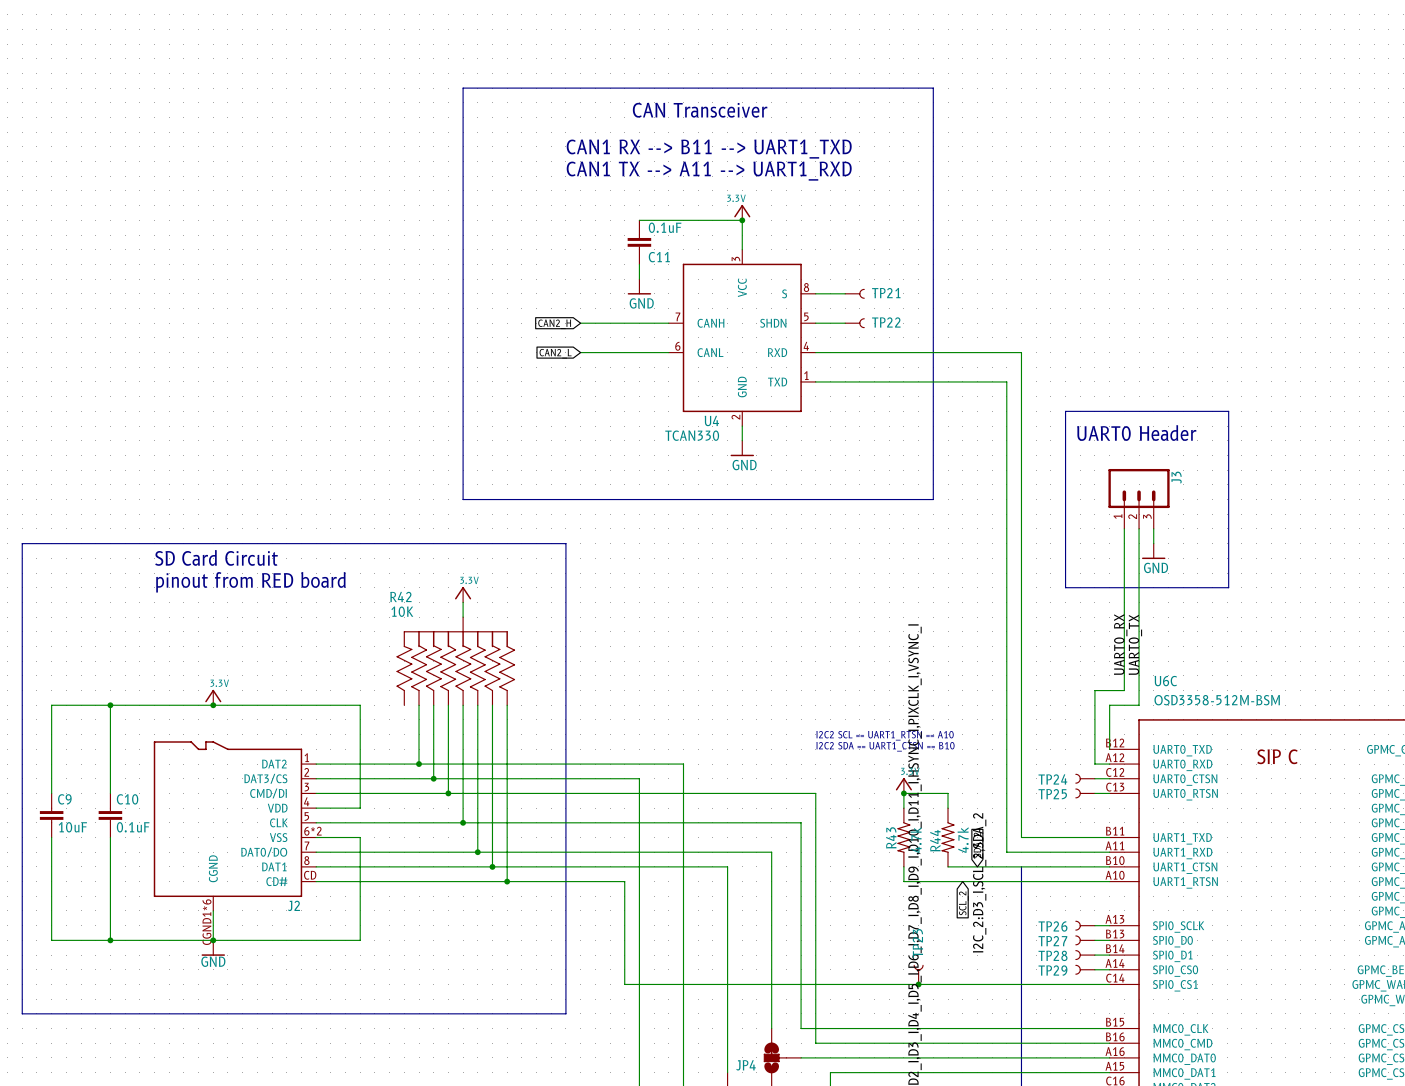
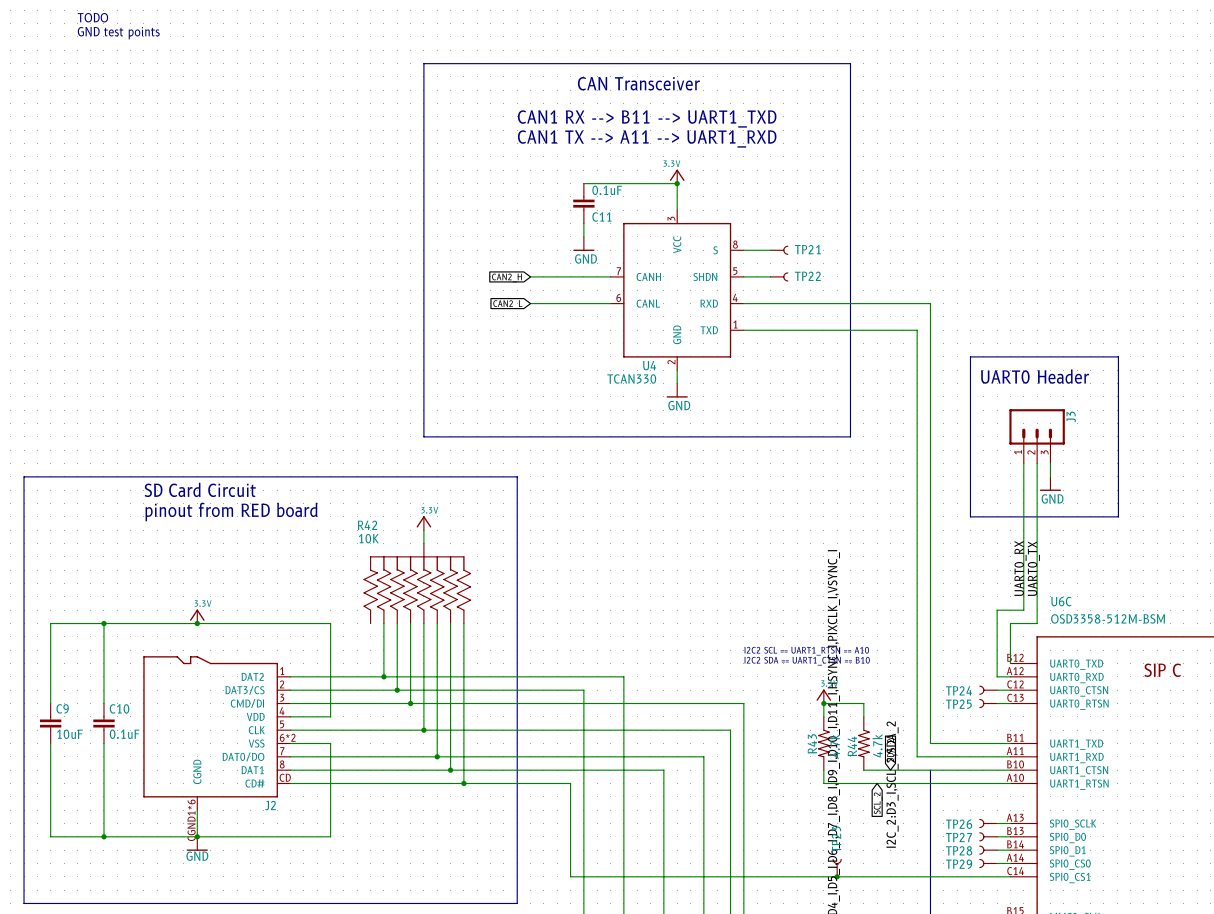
text: none -> TODO (92, 17)
text: none -> GND test points (118, 33)

